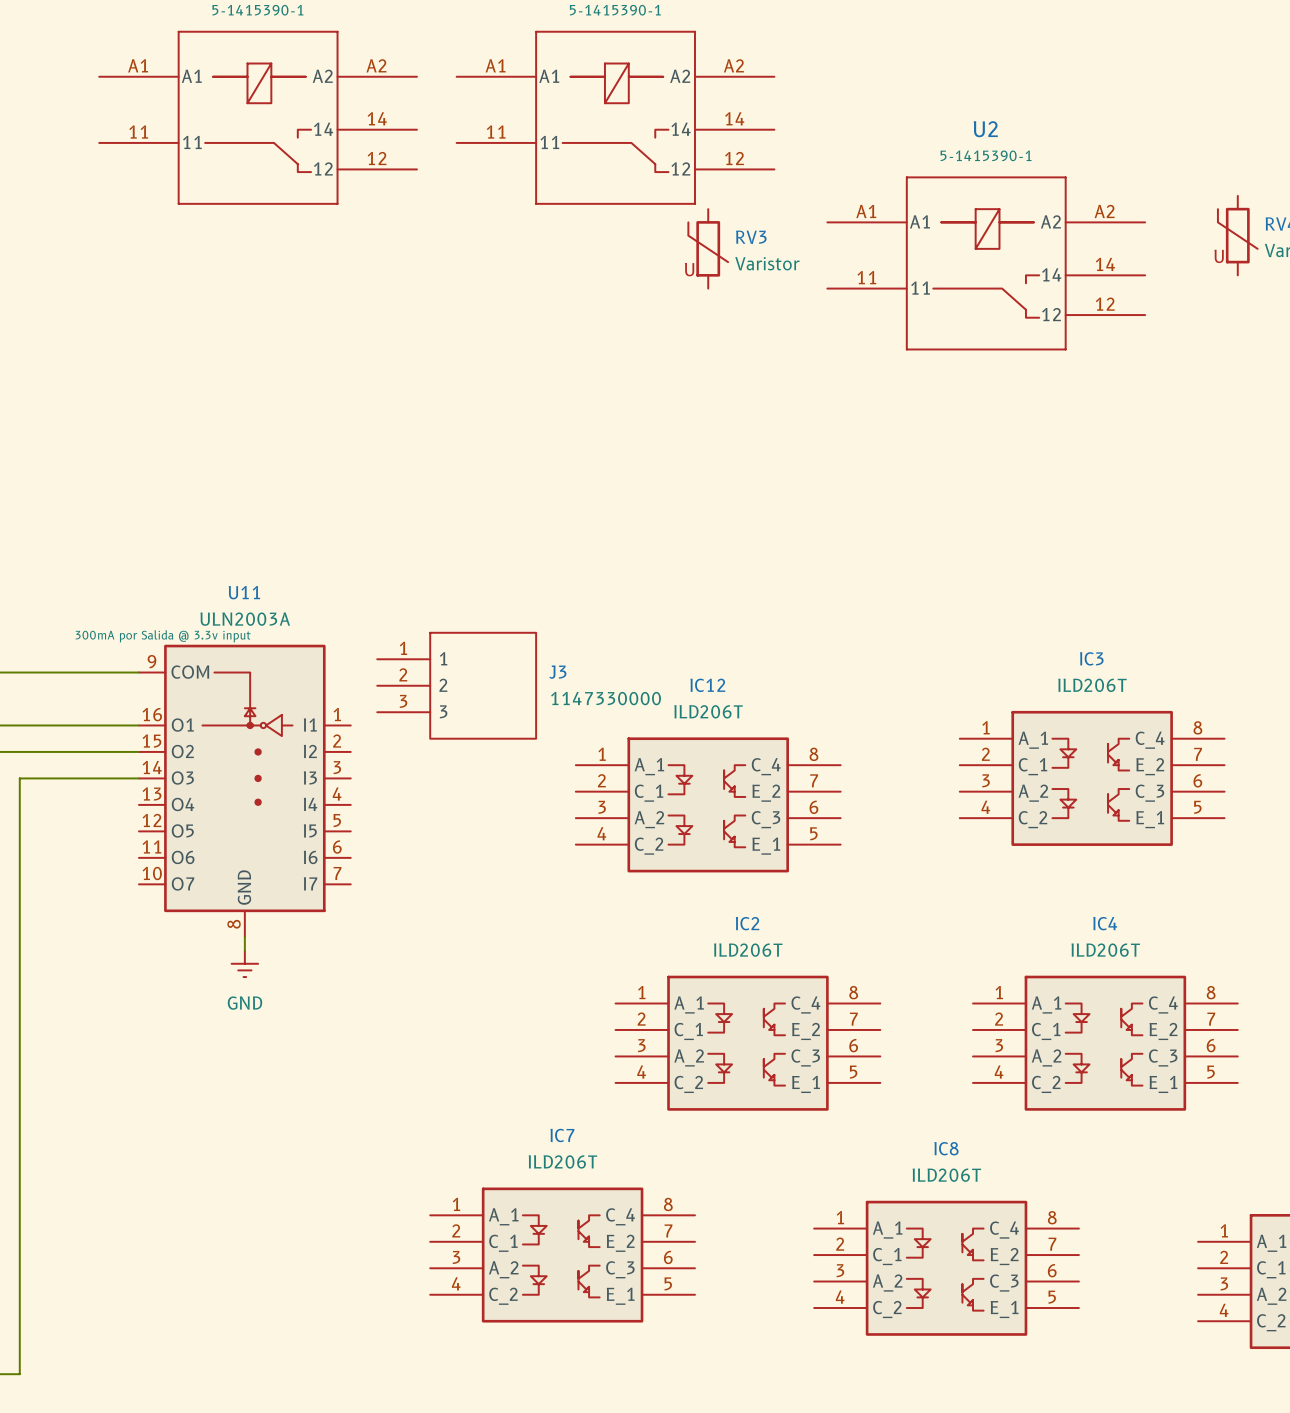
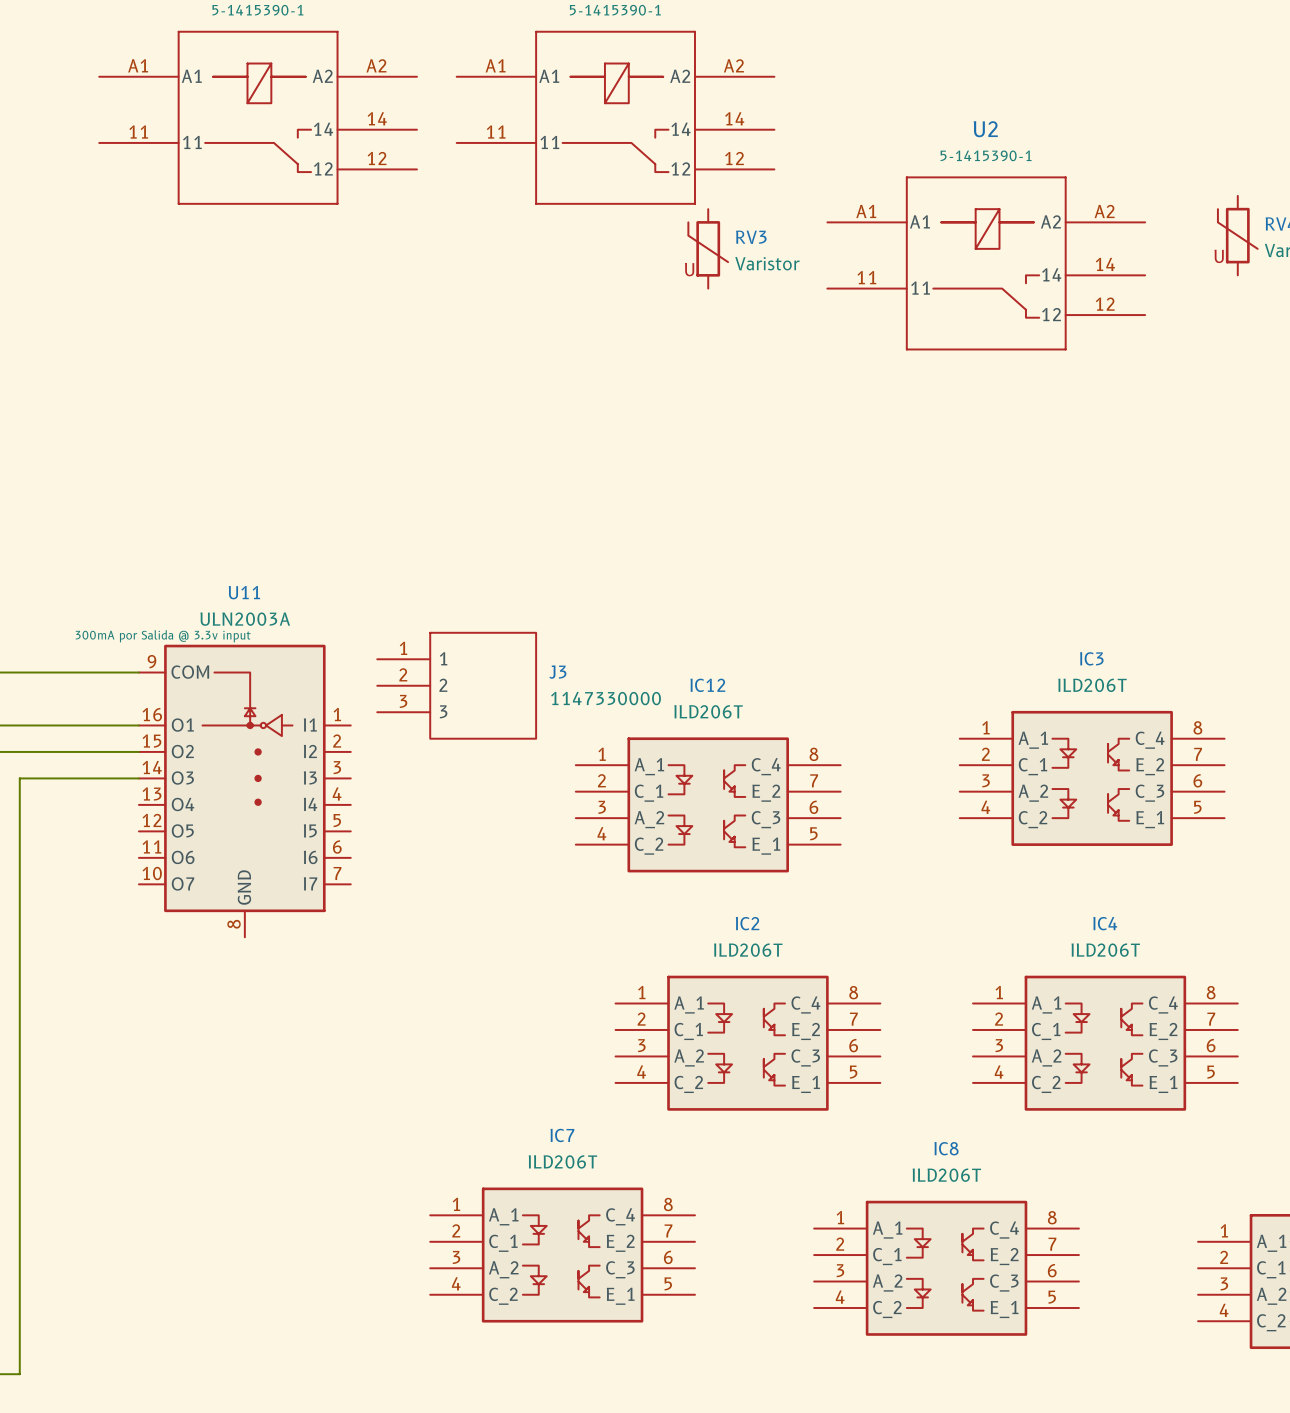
wire: (244, 937) (244, 950) -> none
power symbol: GND (244, 963) -> none

